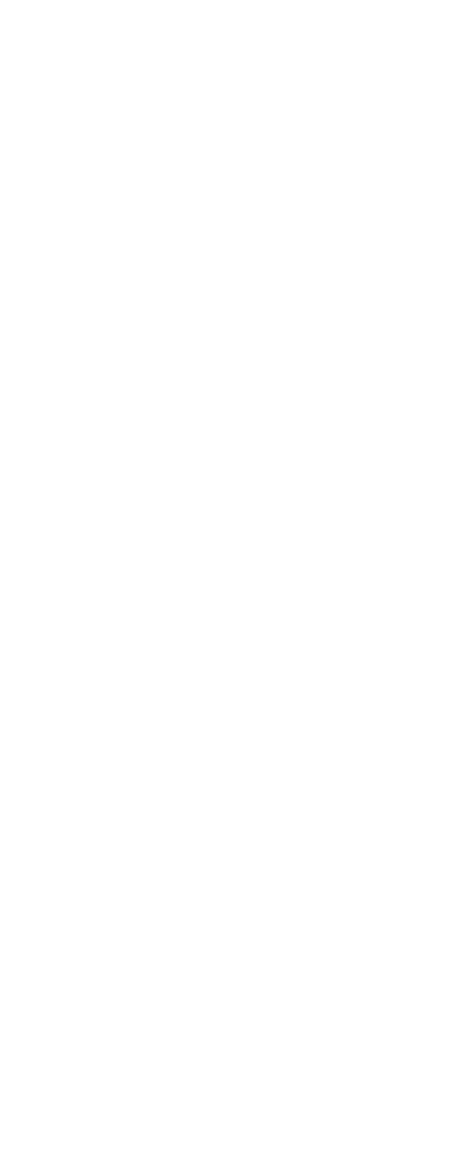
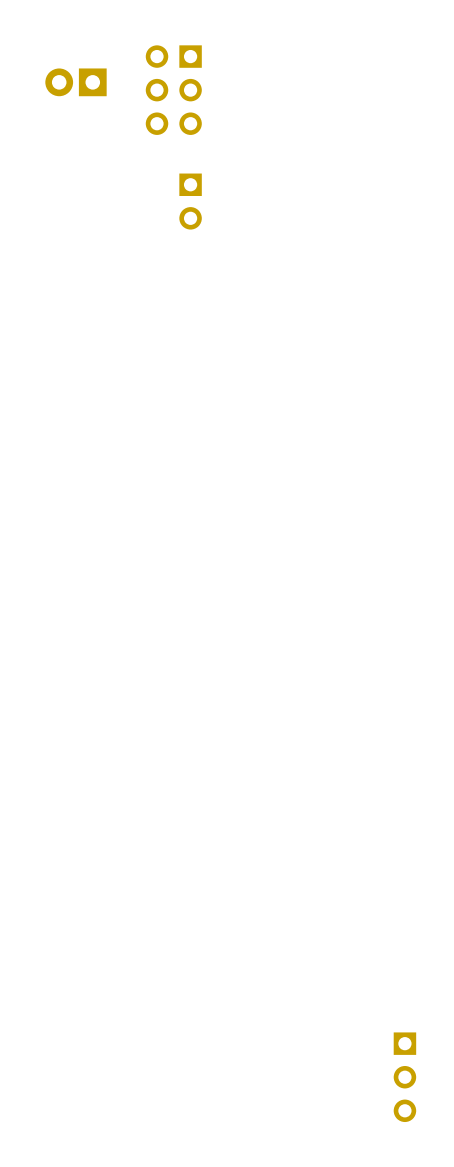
part: none -> (75, 82)
part: none -> (173, 90)
part: none -> (190, 201)
part: none -> (404, 1077)

